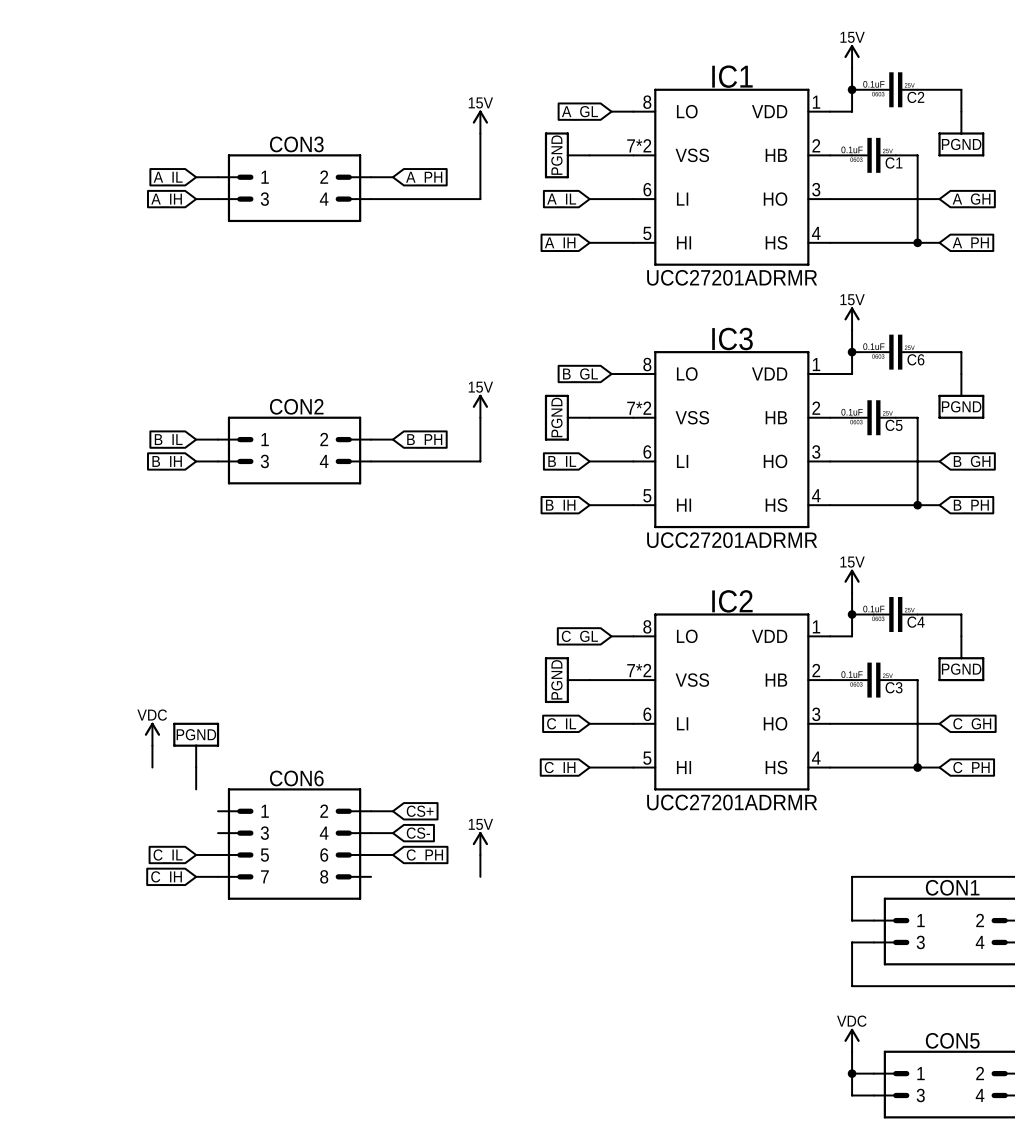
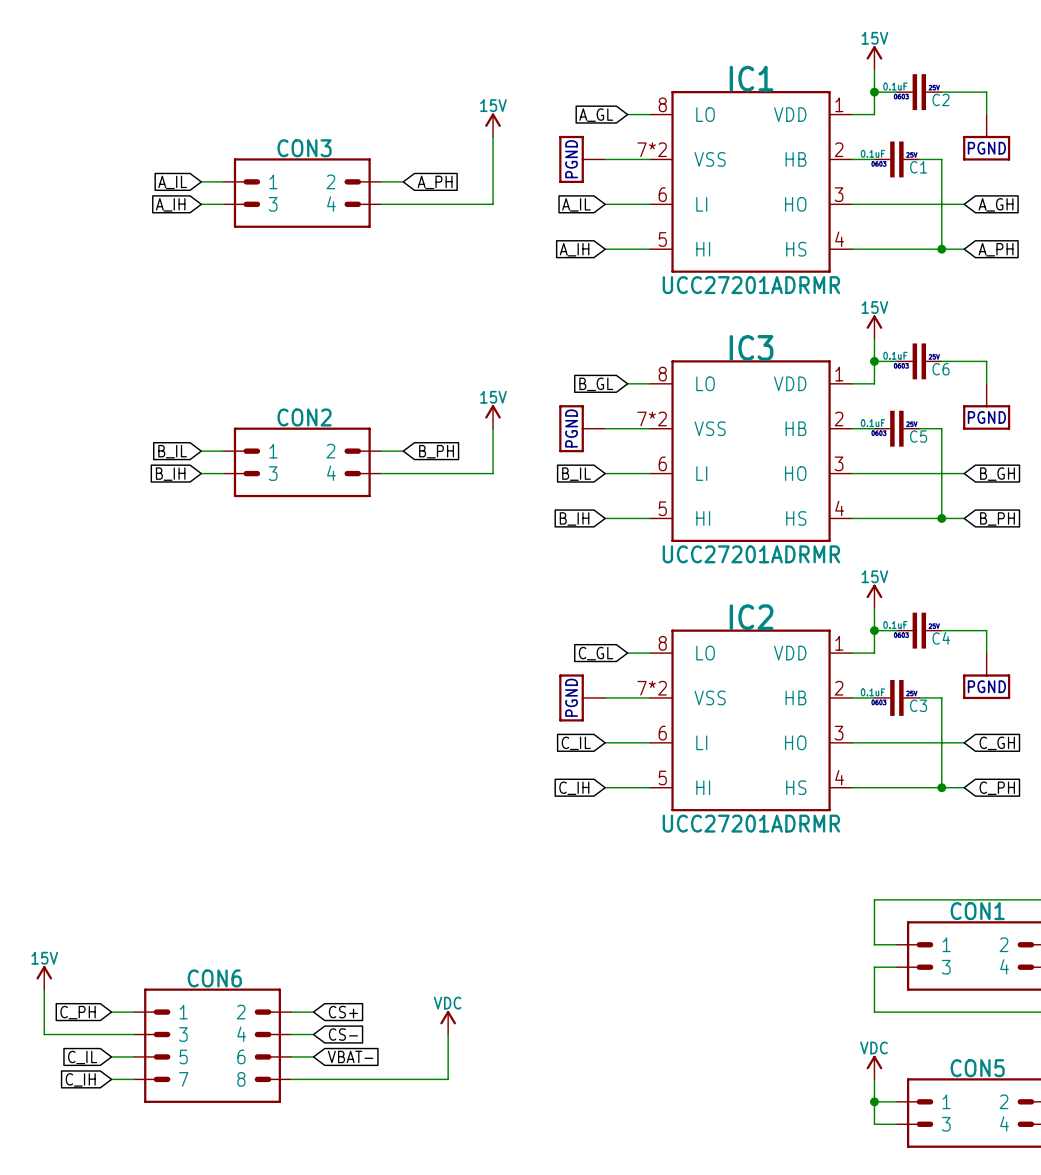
power symbol: VDC (152, 734) -> none
wire: (152, 745) (152, 767) -> none
power symbol: PGND (196, 745) -> none
wire: (196, 767) (196, 789) -> none
wire: (371, 811) (392, 811) -> (291, 1012) (313, 1012)
global label position: CS+ (420, 811) -> CS+ (343, 1012)
wire: (371, 833) (392, 833) -> (291, 1034) (313, 1034)
global label position: CS- (418, 833) -> CS- (343, 1034)
power symbol: 15V (480, 843) -> none
CON6 position: (294, 844) -> (212, 1045)
wire: (196, 854) (218, 854) -> (111, 1056) (134, 1056)
wire: (371, 854) (392, 854) -> (291, 1056) (313, 1056)
wire: (480, 854) (480, 876) -> none
global label position: C_IL (168, 856) -> C_IL (82, 1057)
global label: C_PH (424, 856) -> none
wire: (196, 876) (218, 876) -> (111, 1079) (134, 1079)
global label position: C_IH (166, 878) -> C_IH (80, 1079)
power symbol: none -> 15V (44, 977)
wire: none -> (44, 989) (44, 1034) (134, 1034)
wire: none -> (111, 1012) (134, 1012)
global label: none -> C_PH (78, 1012)
power symbol: none -> VDC (448, 1022)
wire: none -> (448, 1034) (448, 1079) (291, 1079)
global label: none -> VBAT- (350, 1056)

